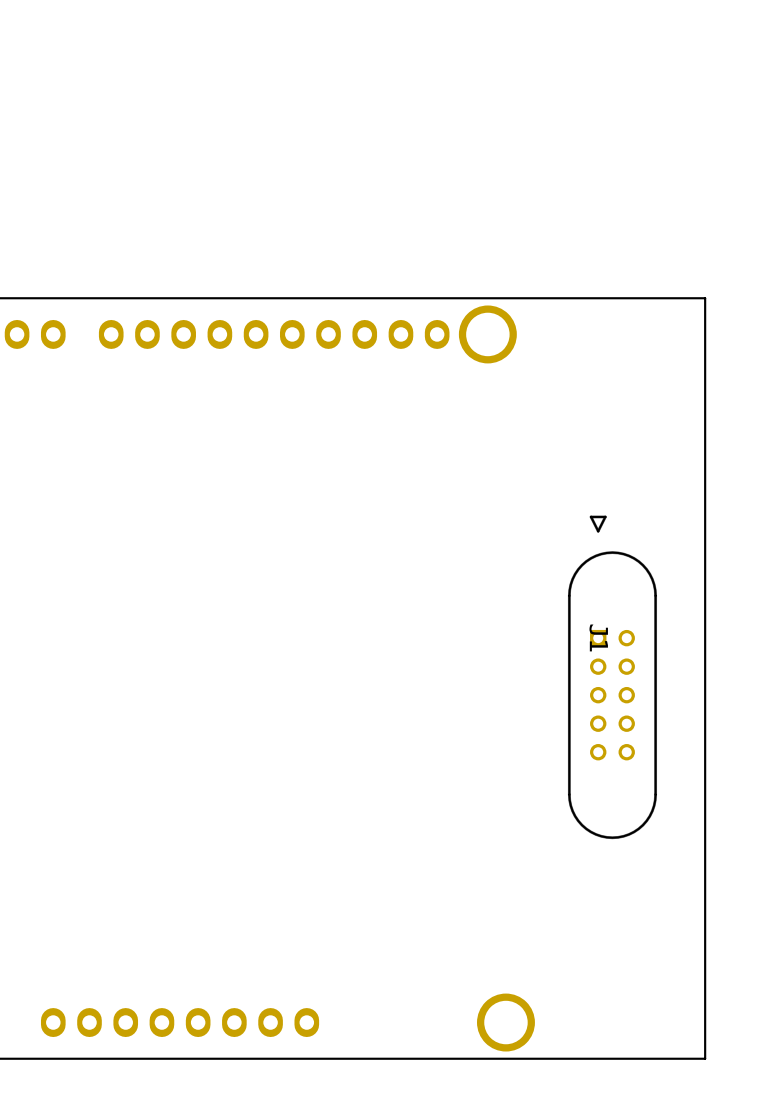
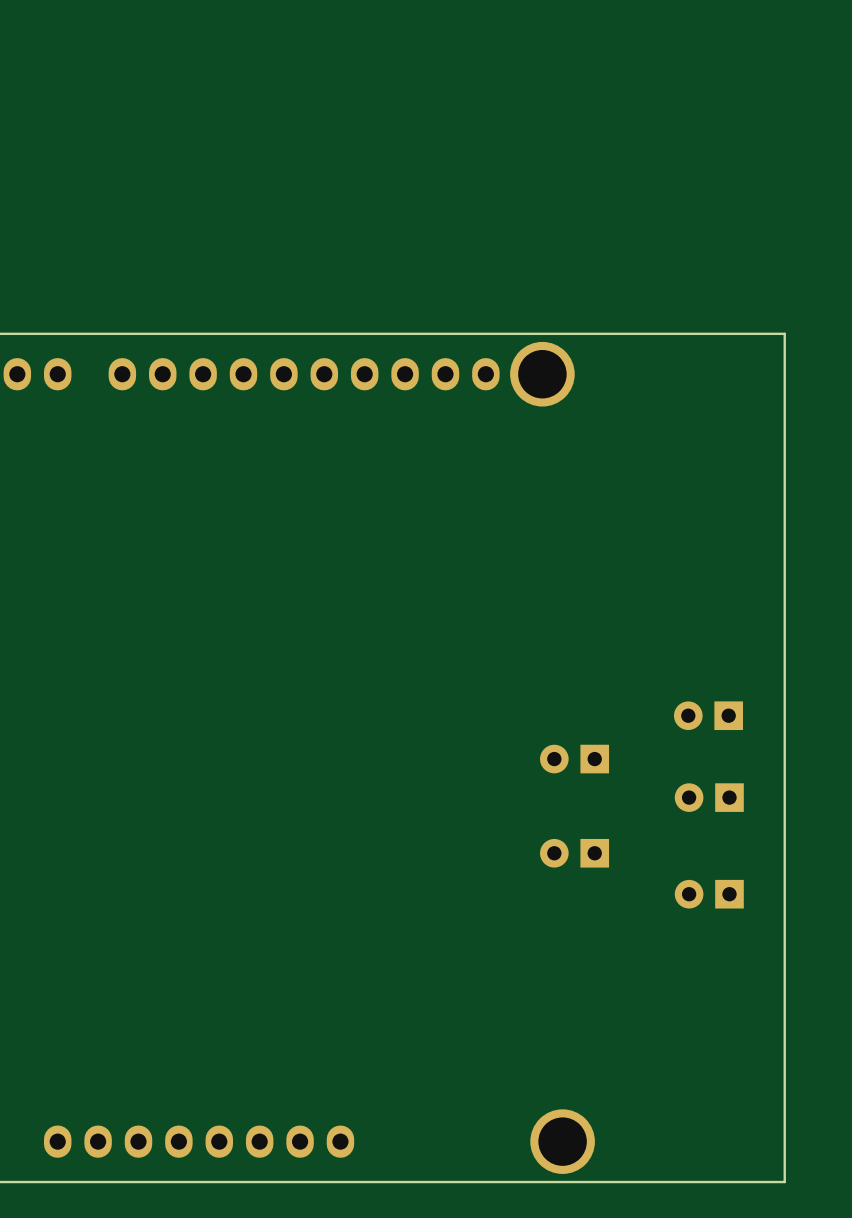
part: none -> (708, 715)
J1: (612, 677) -> none
part: none -> (574, 759)
part: none -> (709, 797)
part: none -> (574, 853)
part: none -> (709, 894)

